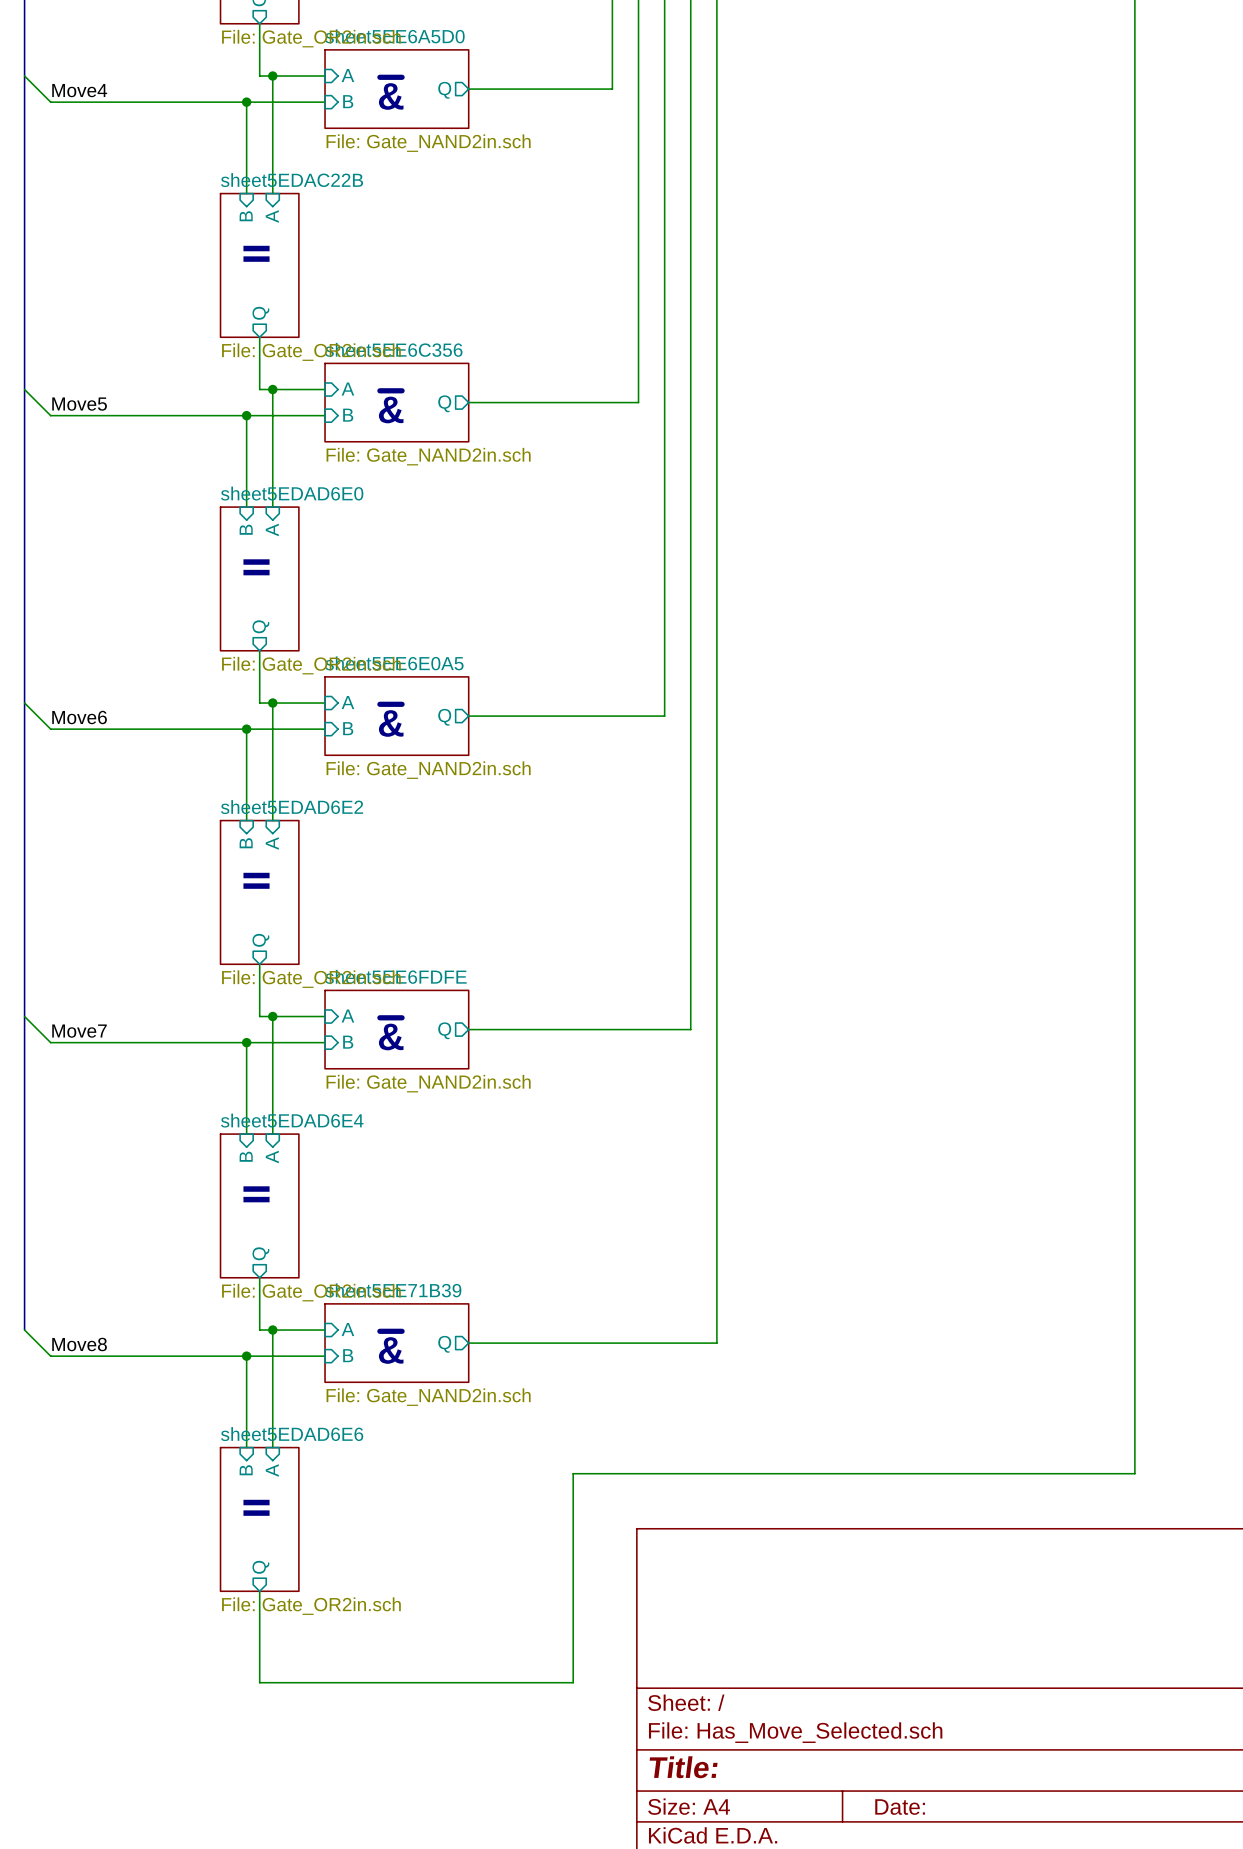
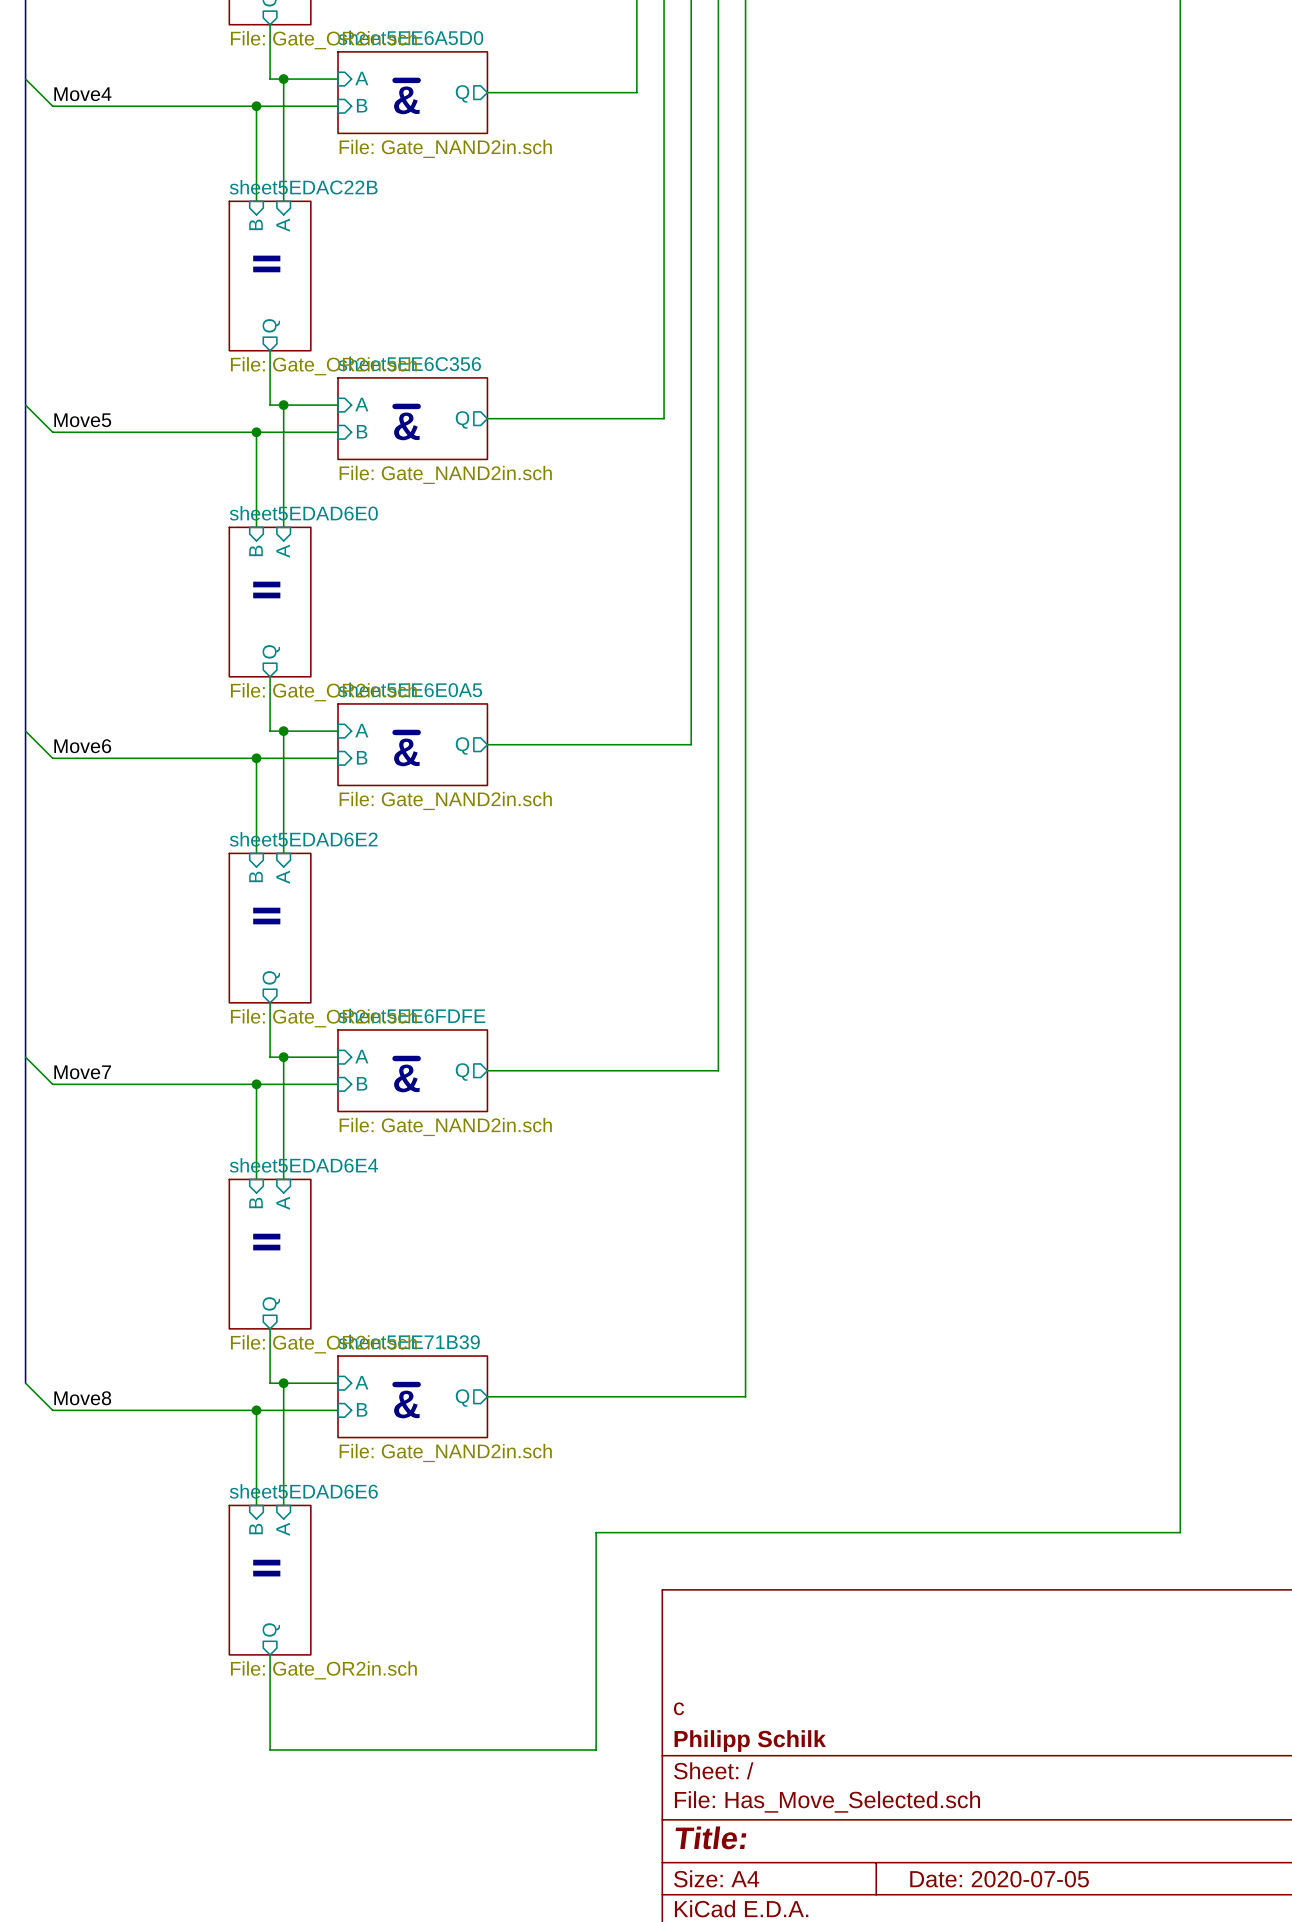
title block: none -> c (679, 1708)
title block: none -> Philipp Schilk (750, 1741)
title block: Date: (900, 1807) -> Date: 2020-07-05 (999, 1879)

